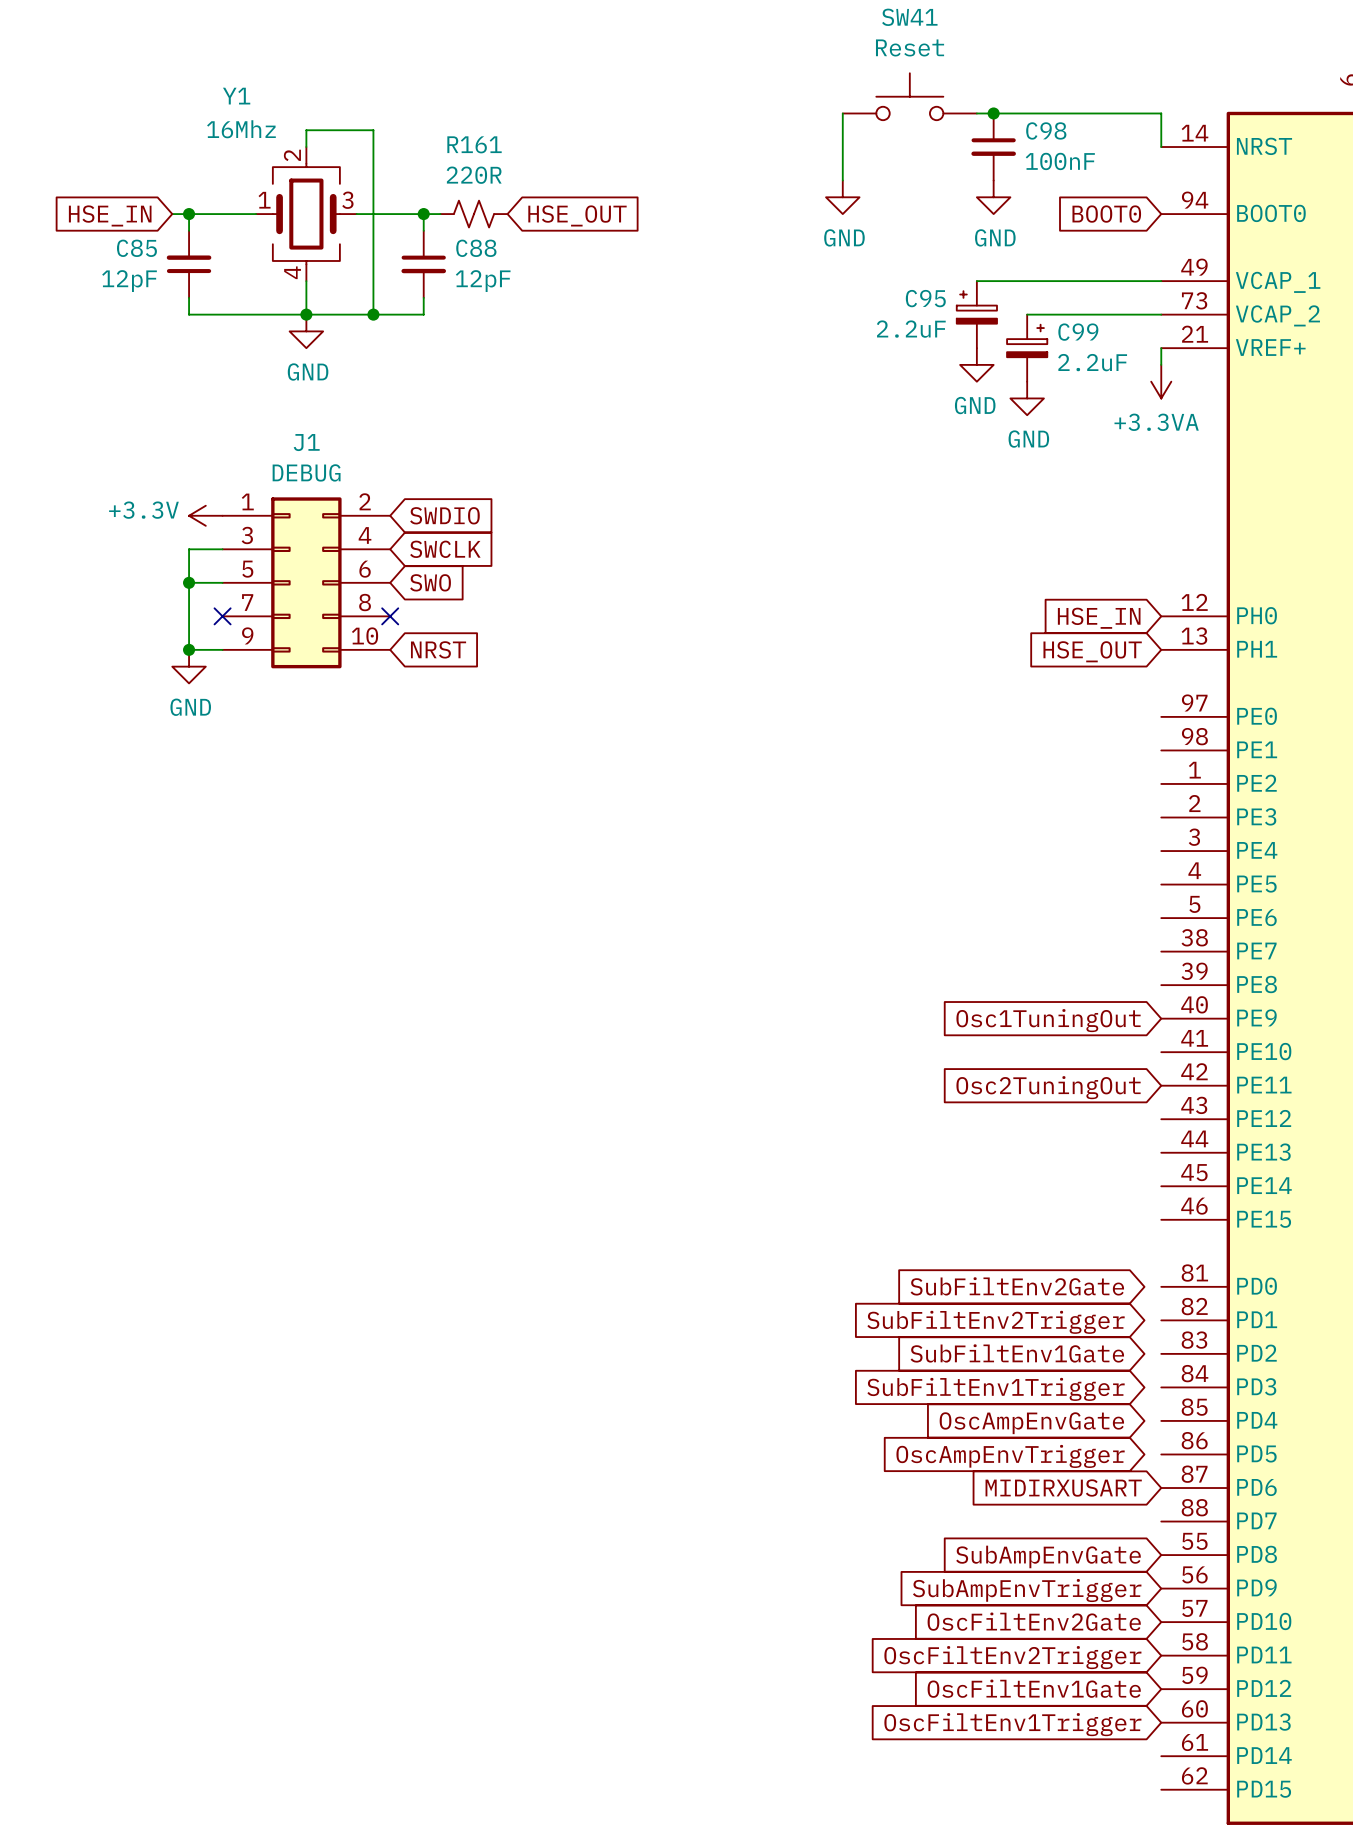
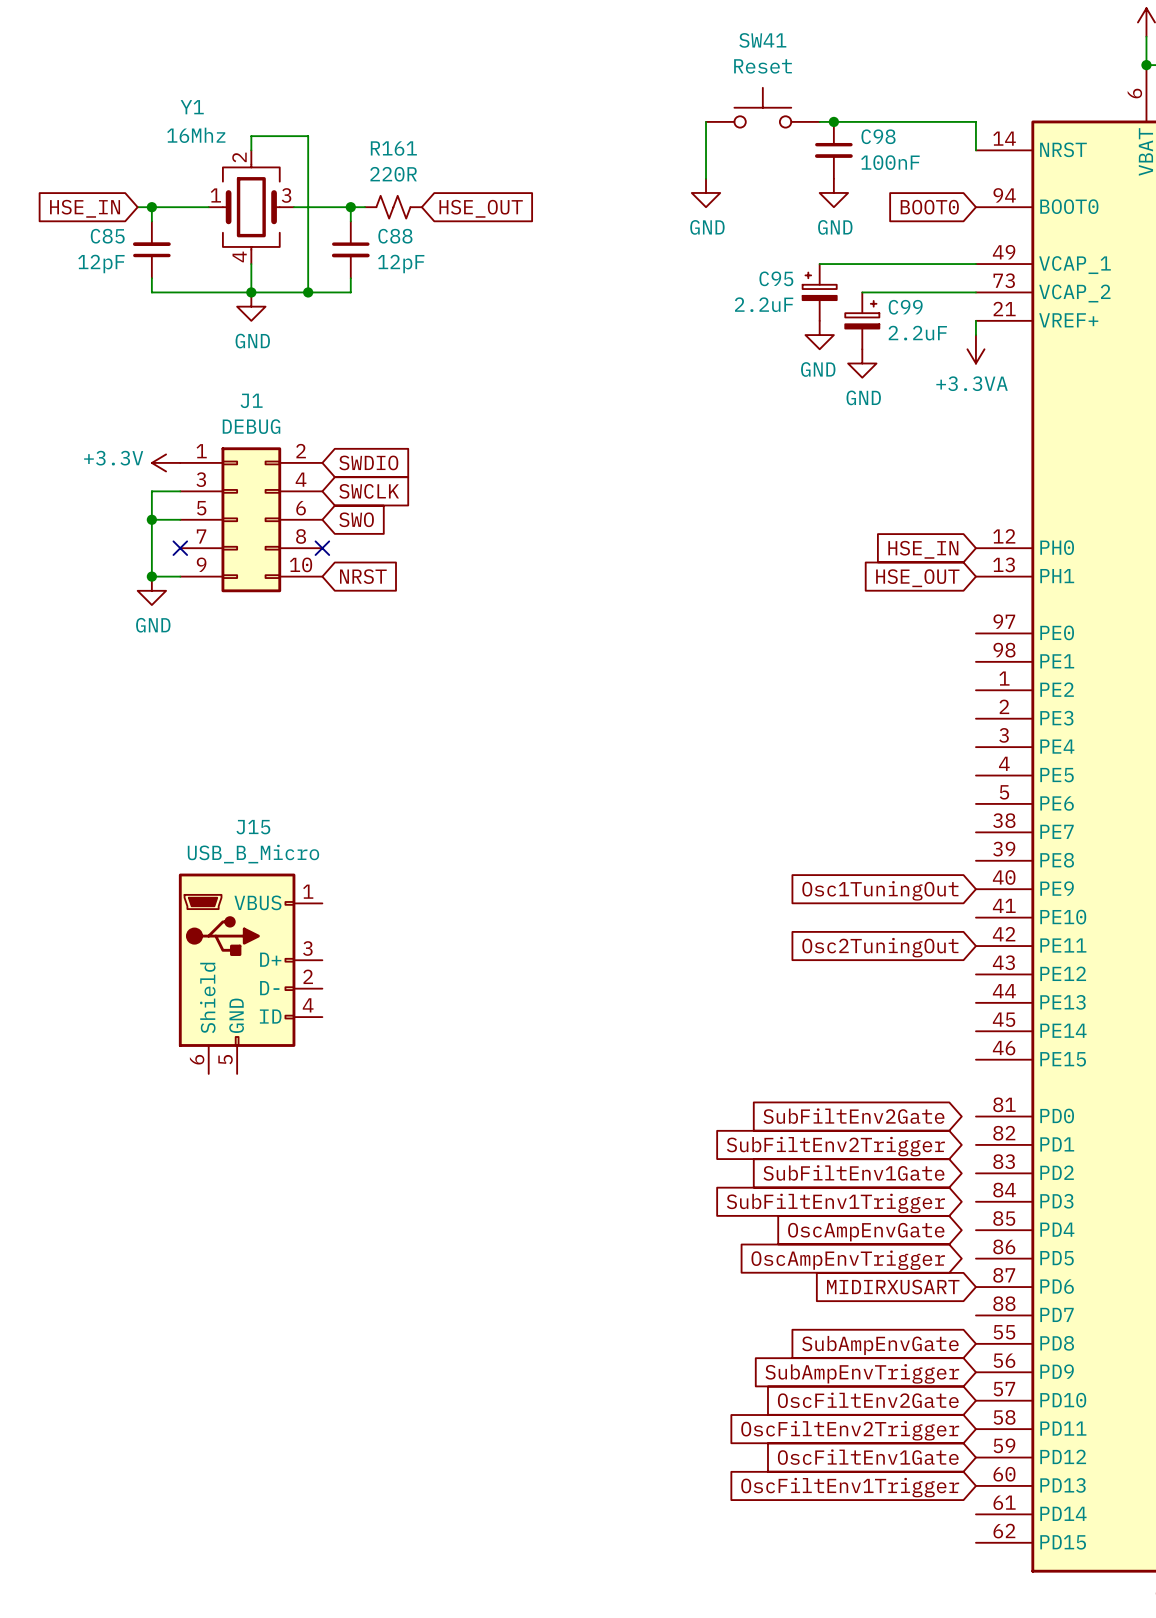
J15: none -> USB_B_Micro (250, 973)

